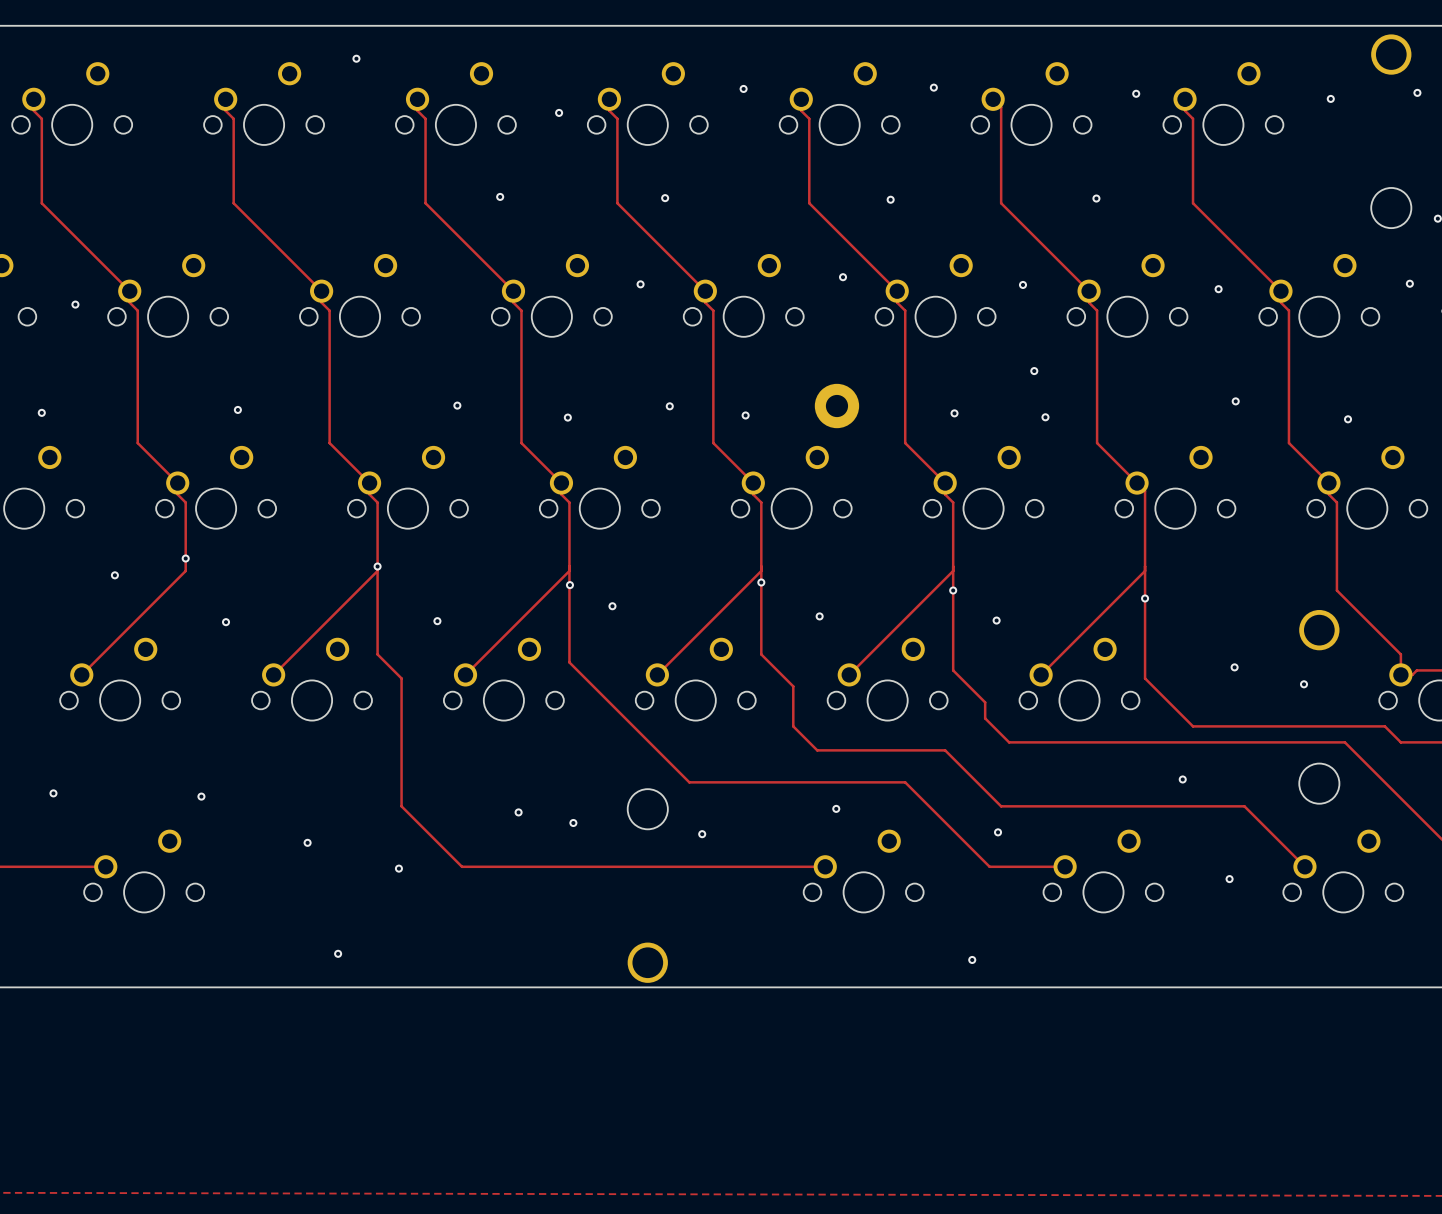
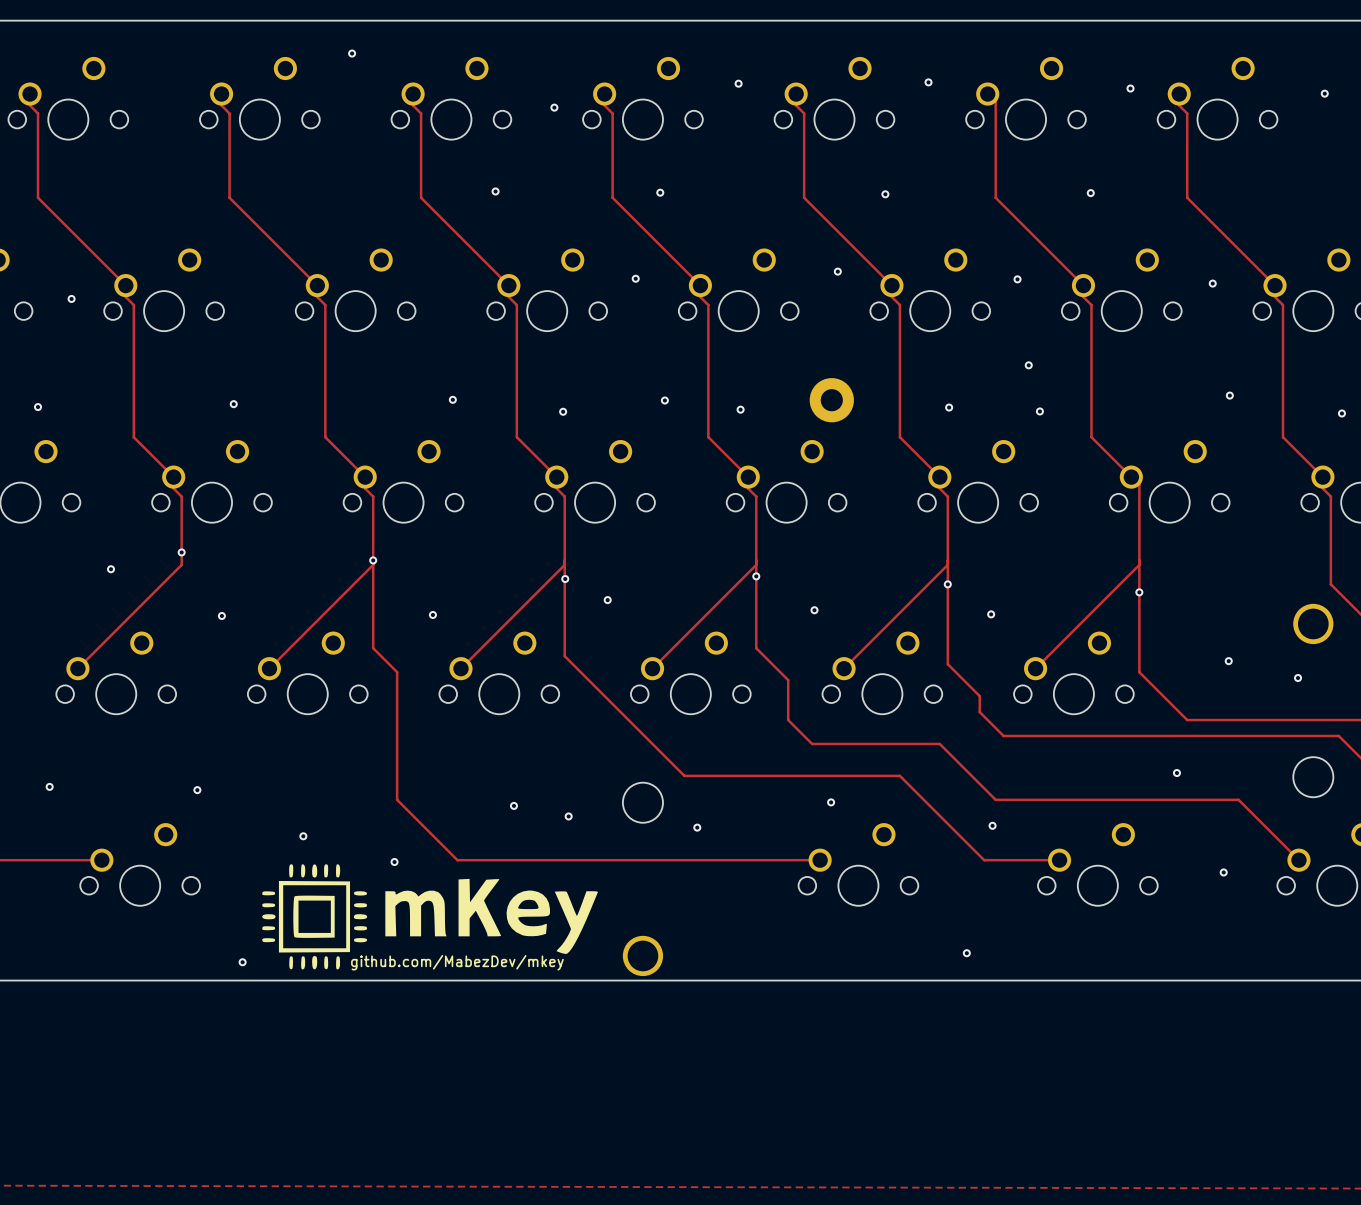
drawing: none -> [262, 864, 598, 970]
via: (338, 953) -> none
via: none -> (242, 962)
text: none -> github.com/MabezDev/mkey (457, 962)

